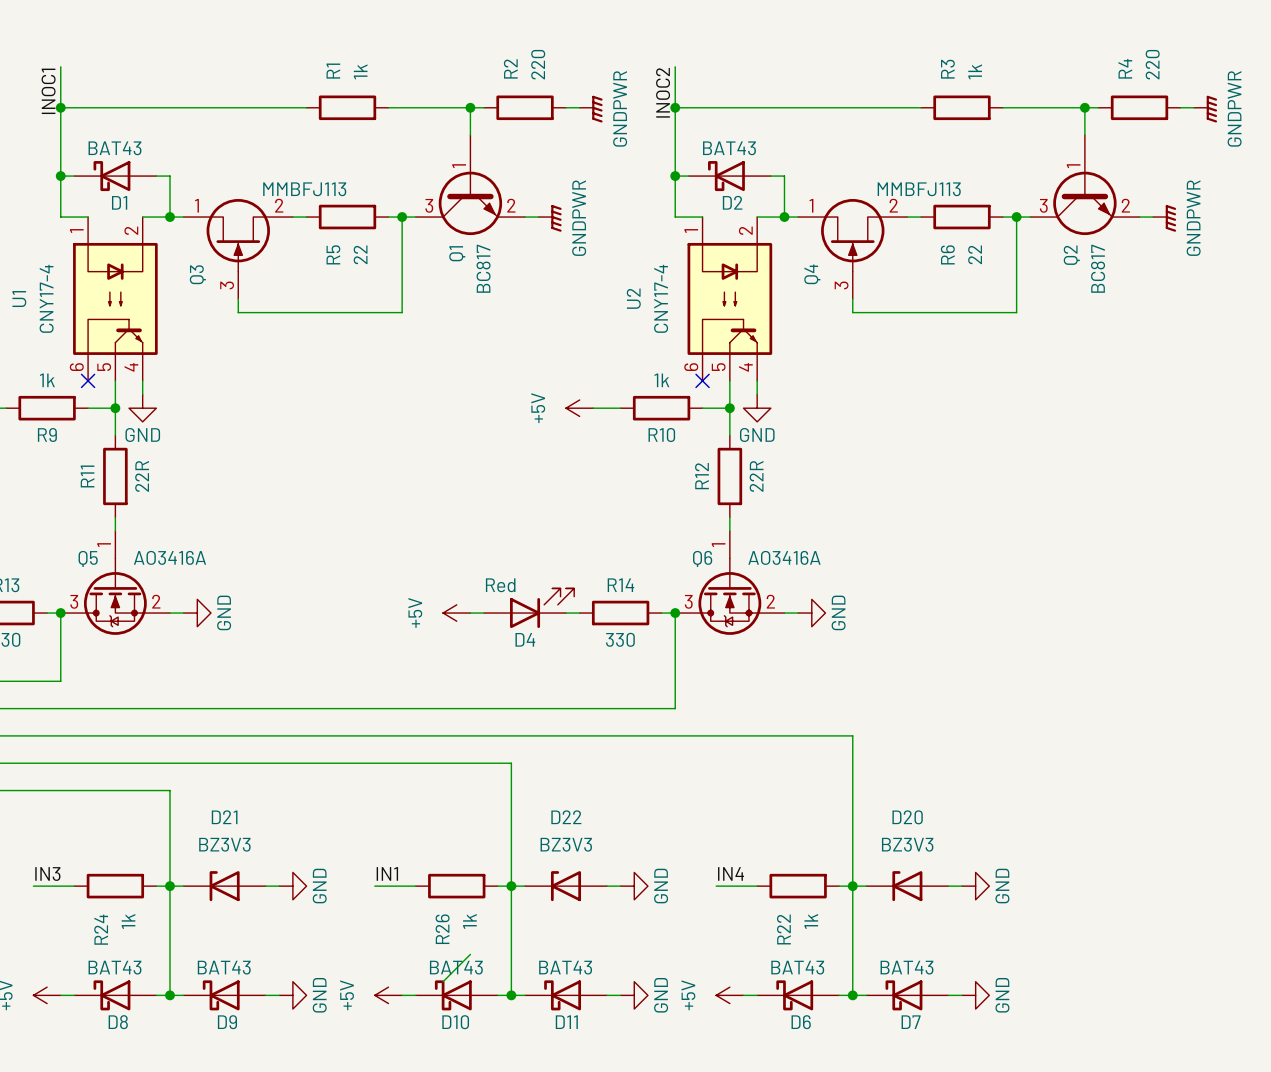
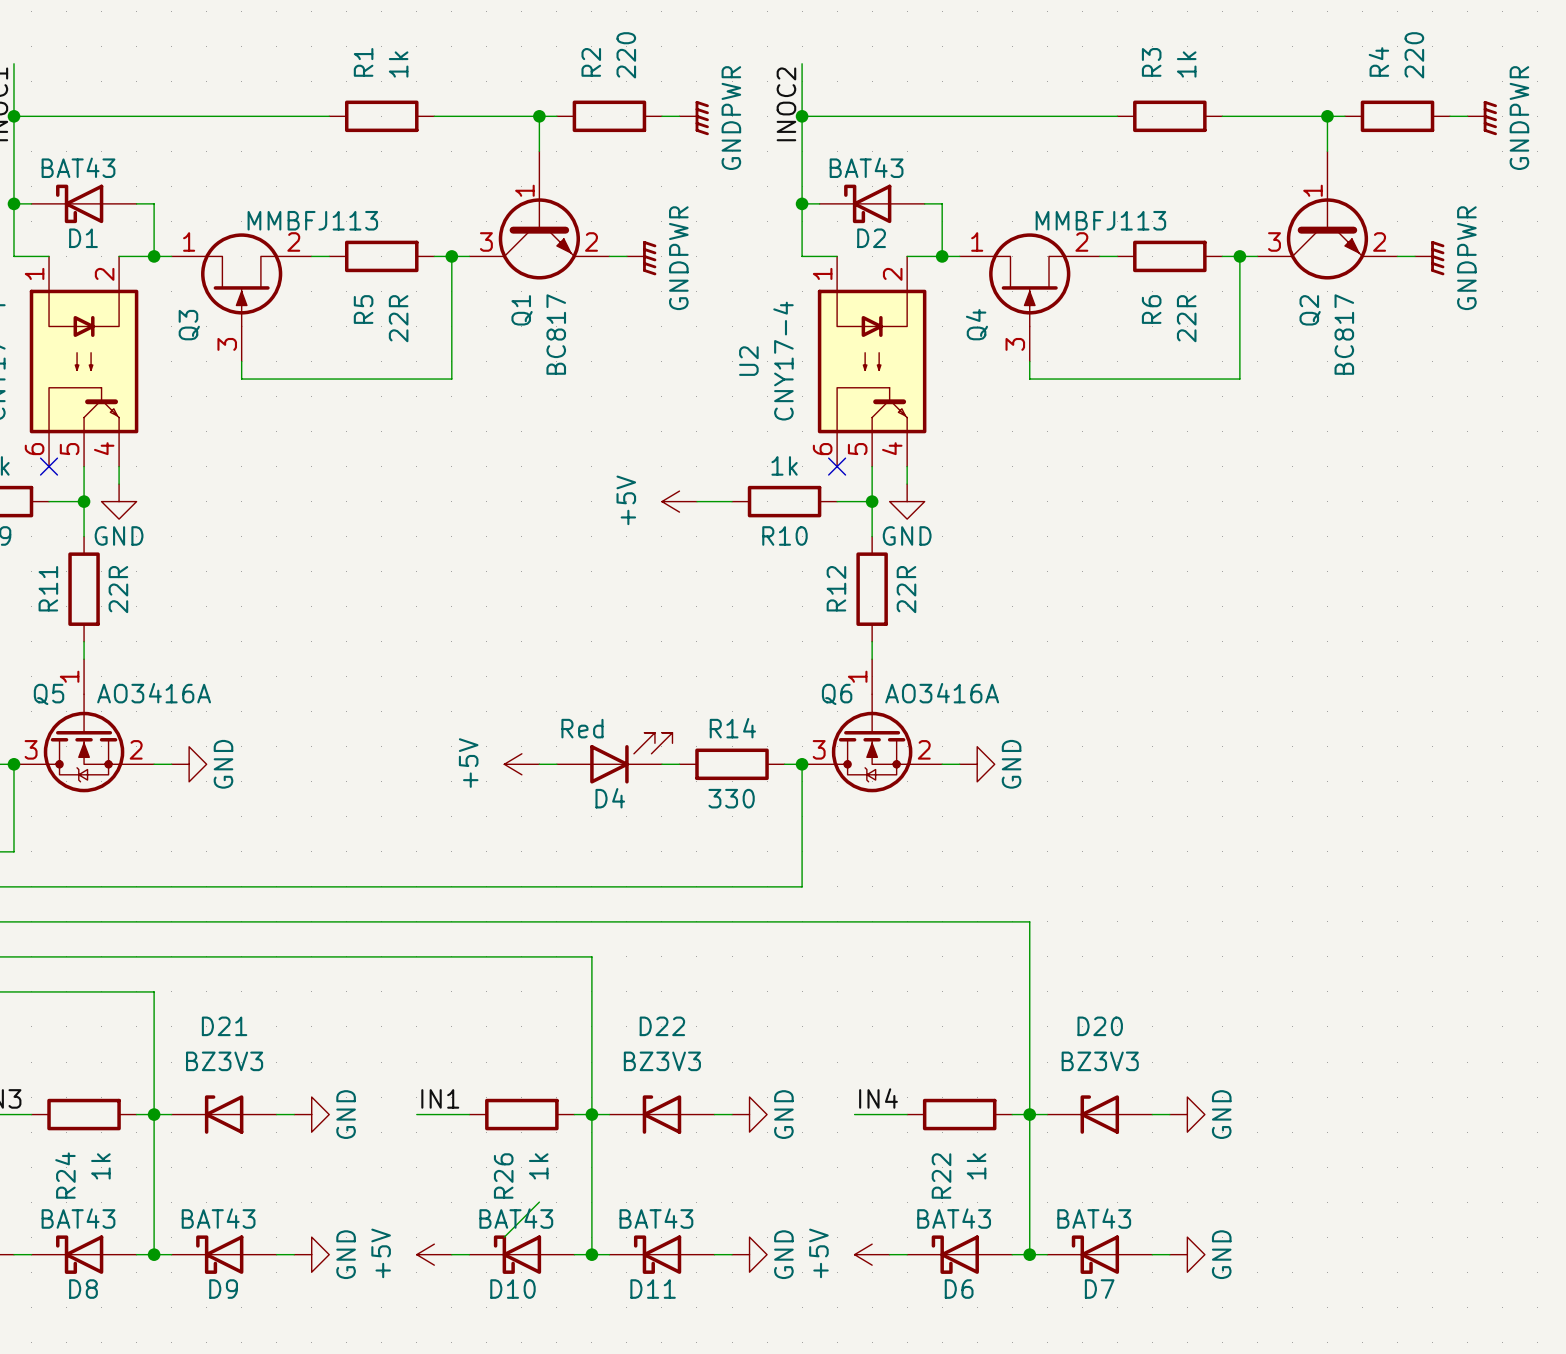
R5 value: 22 (360, 254) -> 22R (398, 318)
R6 value: 22 (975, 254) -> 22R (1186, 318)

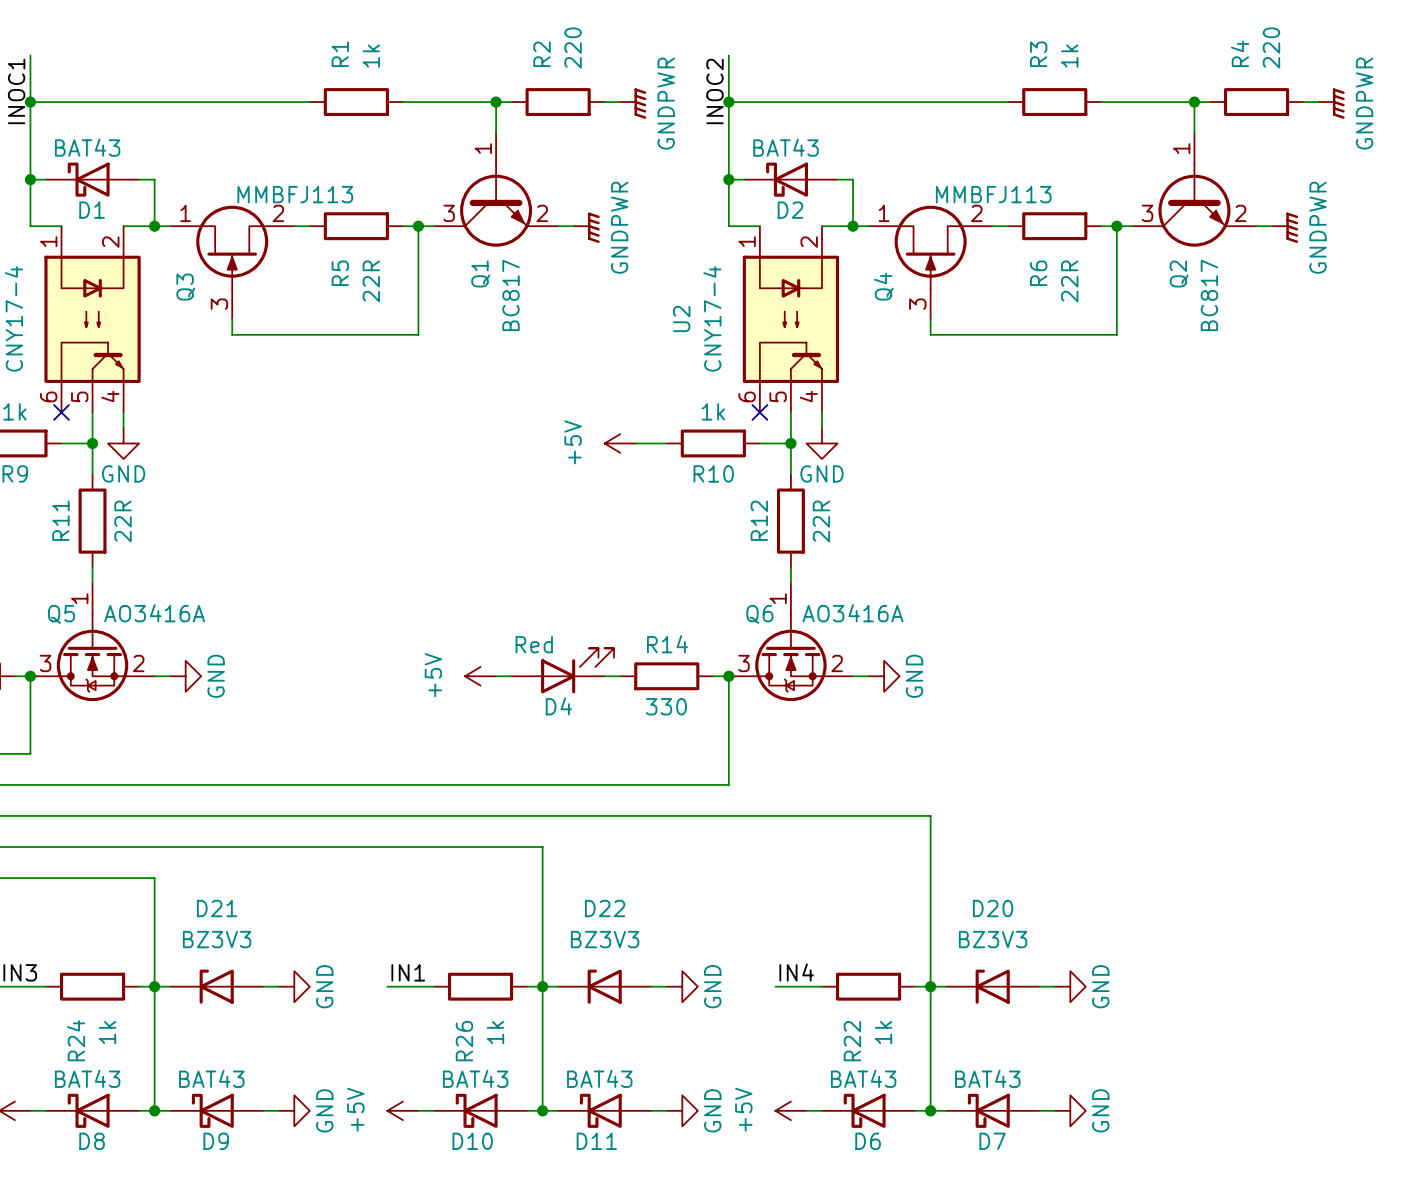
Q1 symbol: [469, 151, 610, 280] -> [433, 133, 559, 247]
Q2 symbol: [1257, 151, 1398, 280] -> [1132, 133, 1257, 247]
wire: (539, 1202) (504, 1237) -> none

